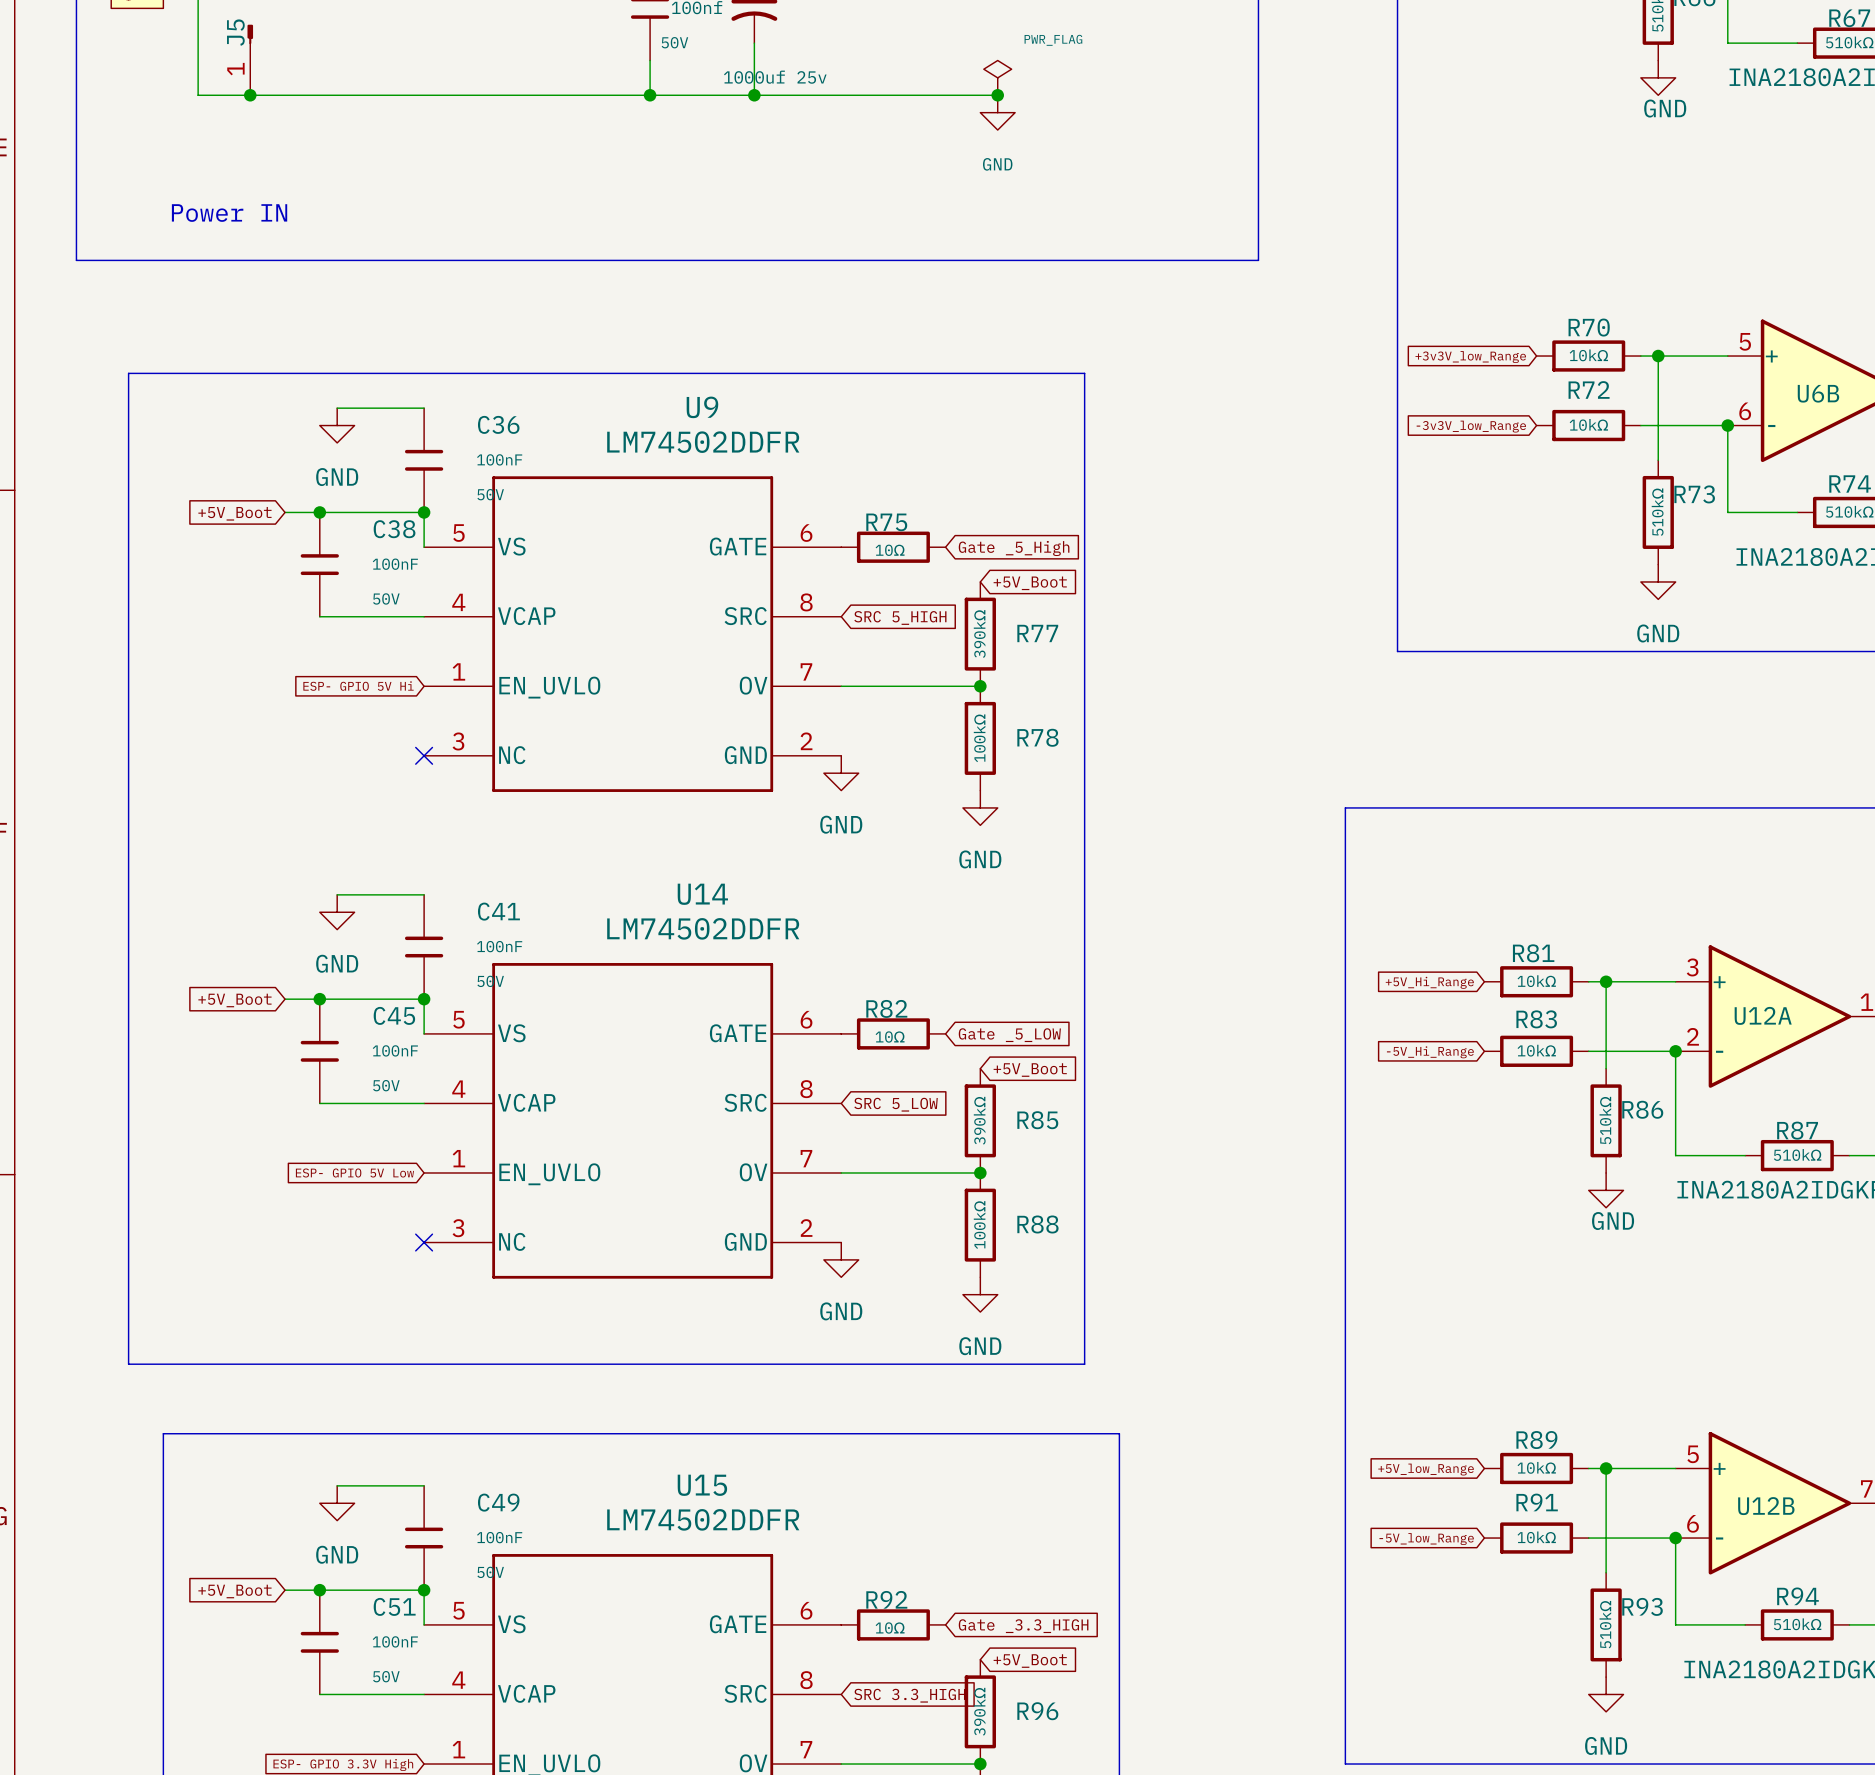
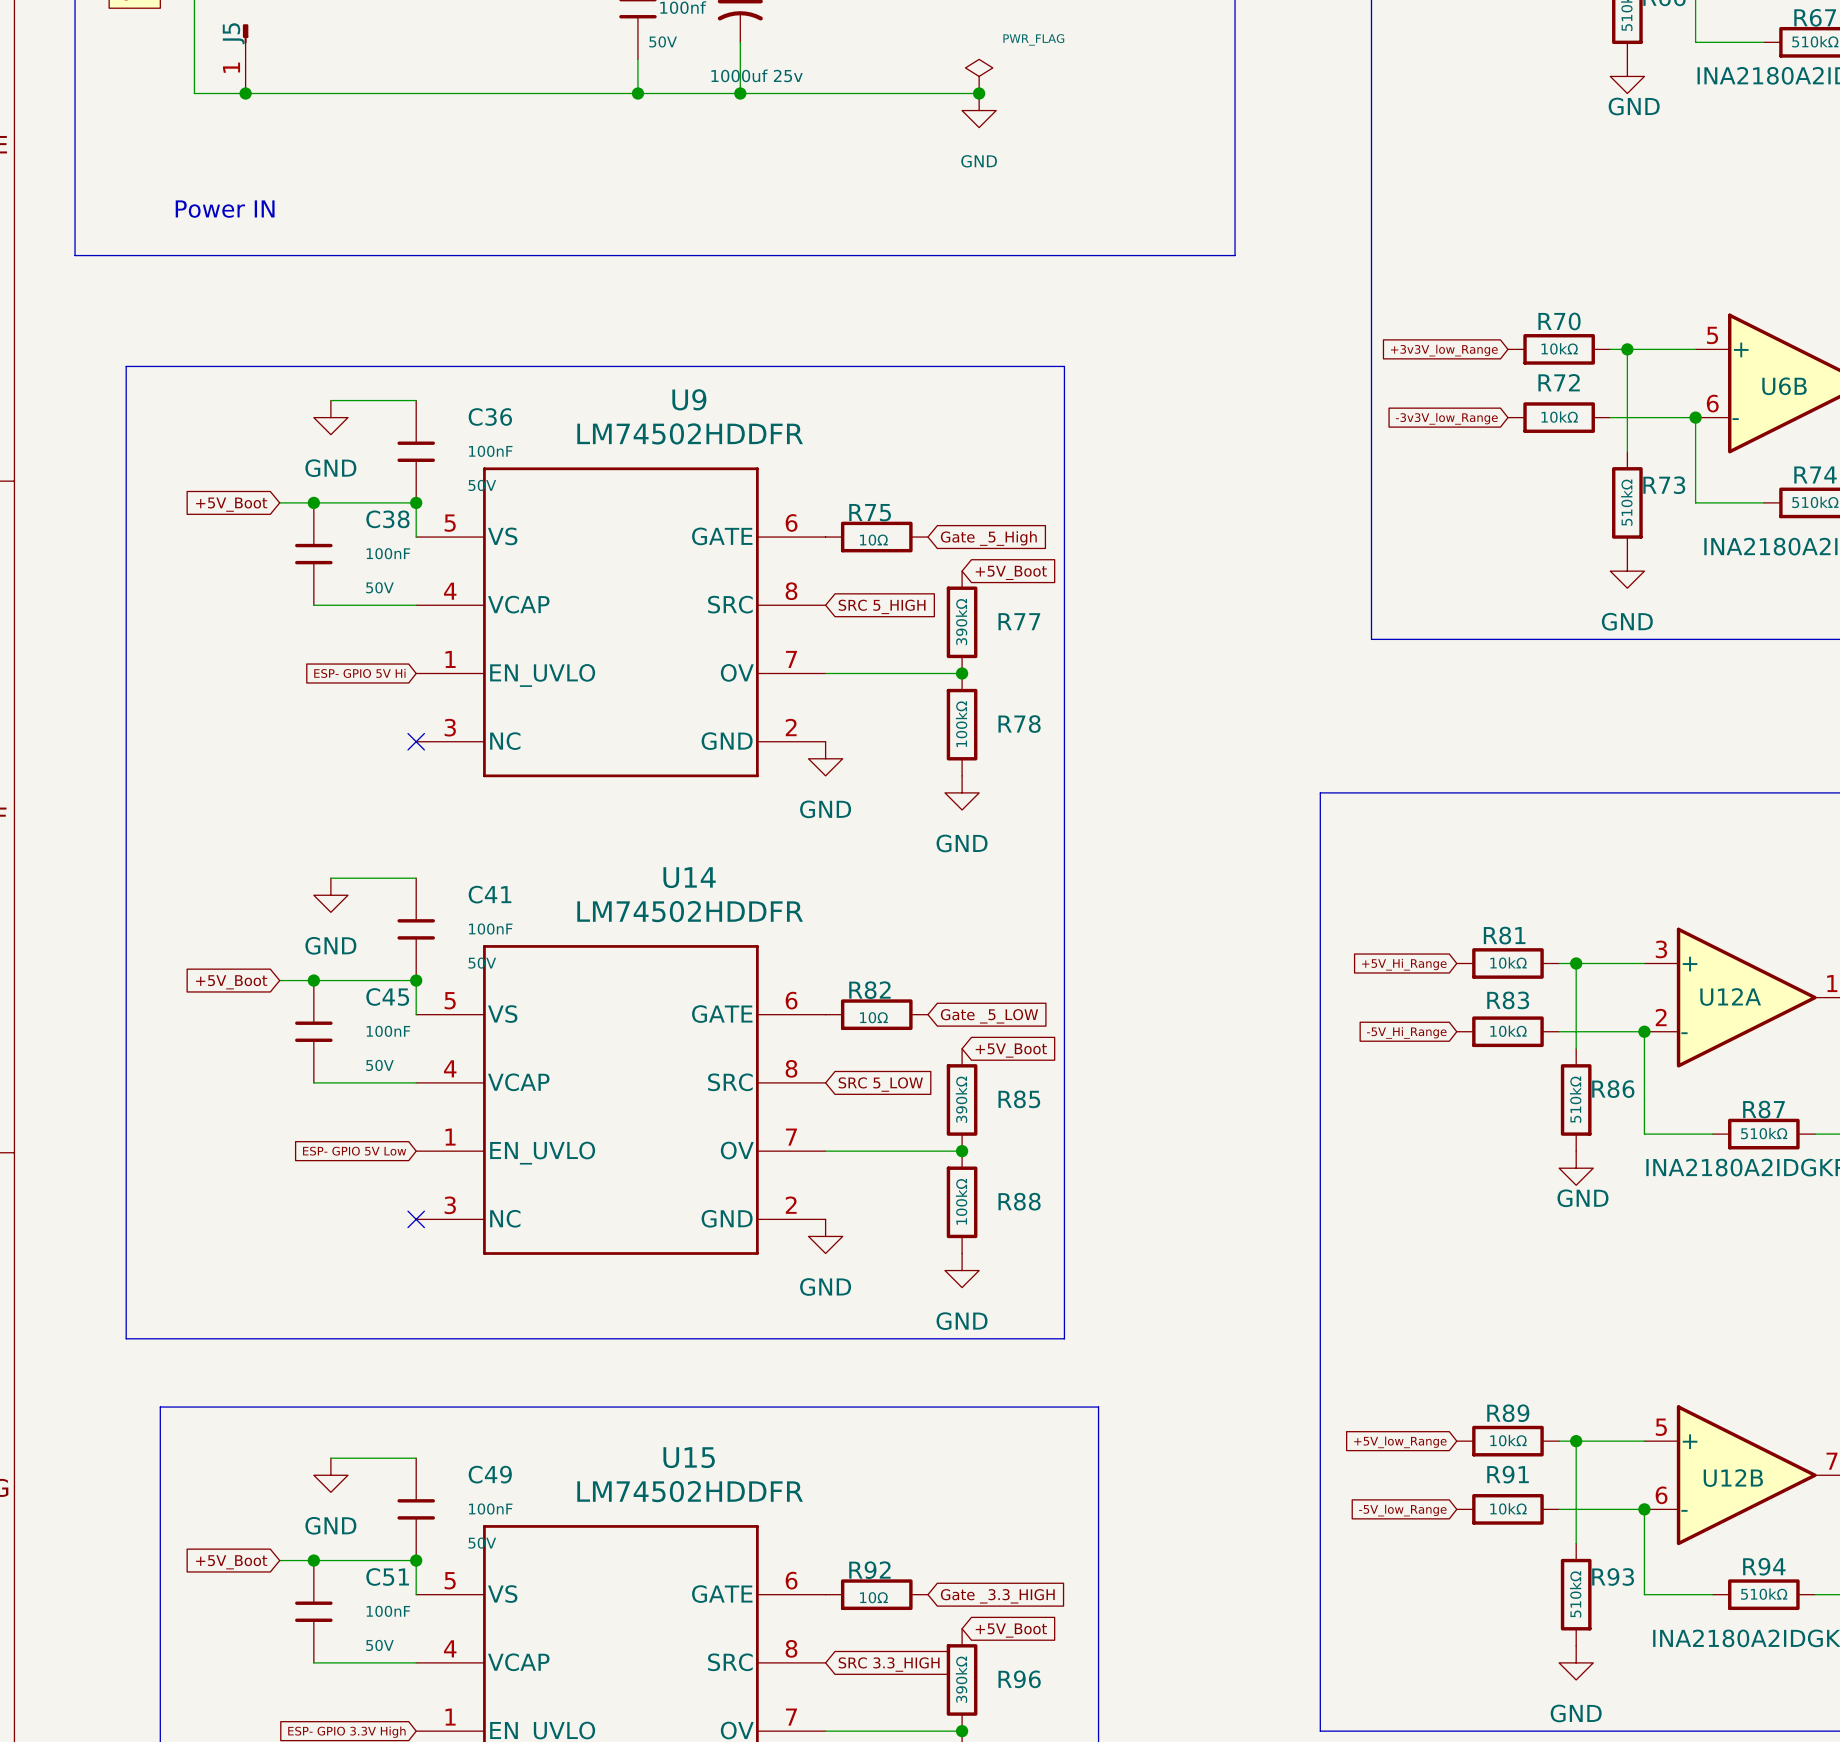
U9 value: LM74502DDFR (703, 442) -> LM74502HDDFR (690, 433)
U14 value: LM74502DDFR (703, 928) -> LM74502HDDFR (690, 911)
U15 value: LM74502DDFR (703, 1519) -> LM74502HDDFR (690, 1491)

